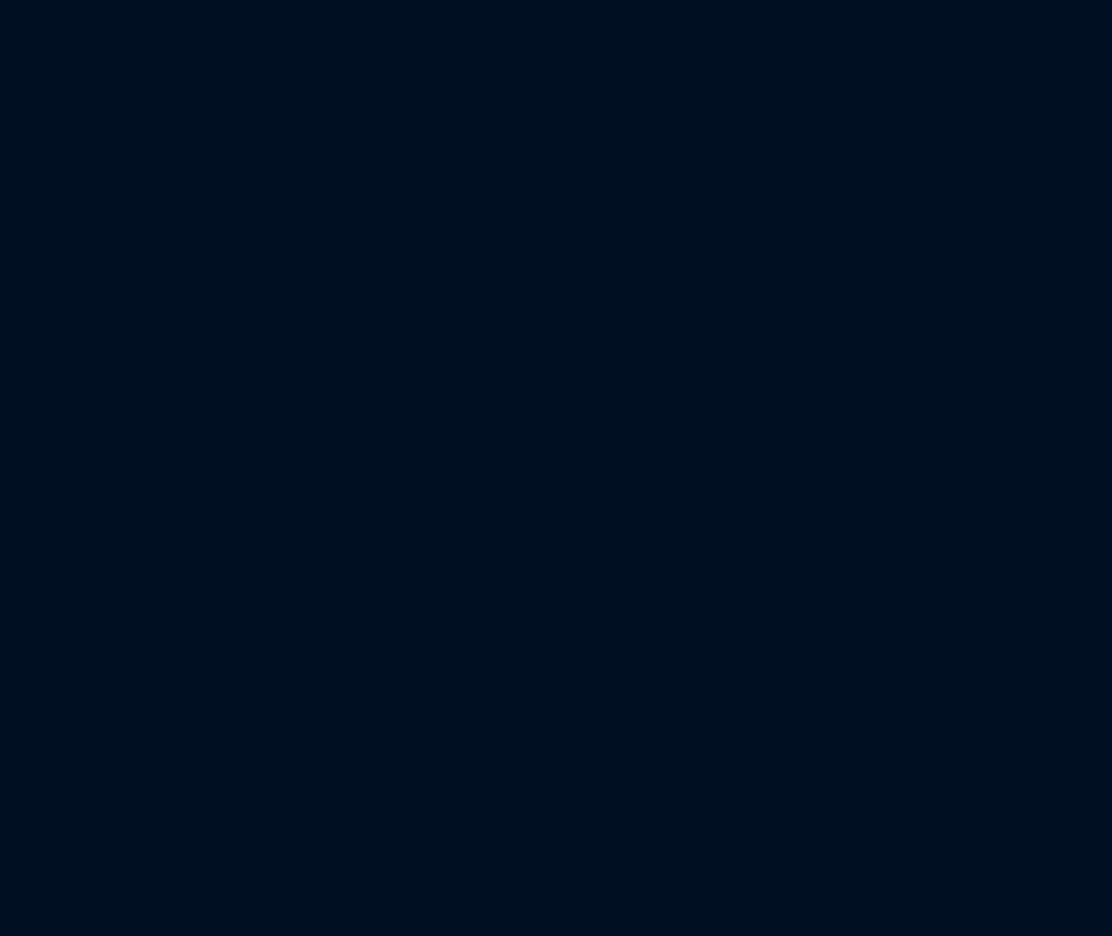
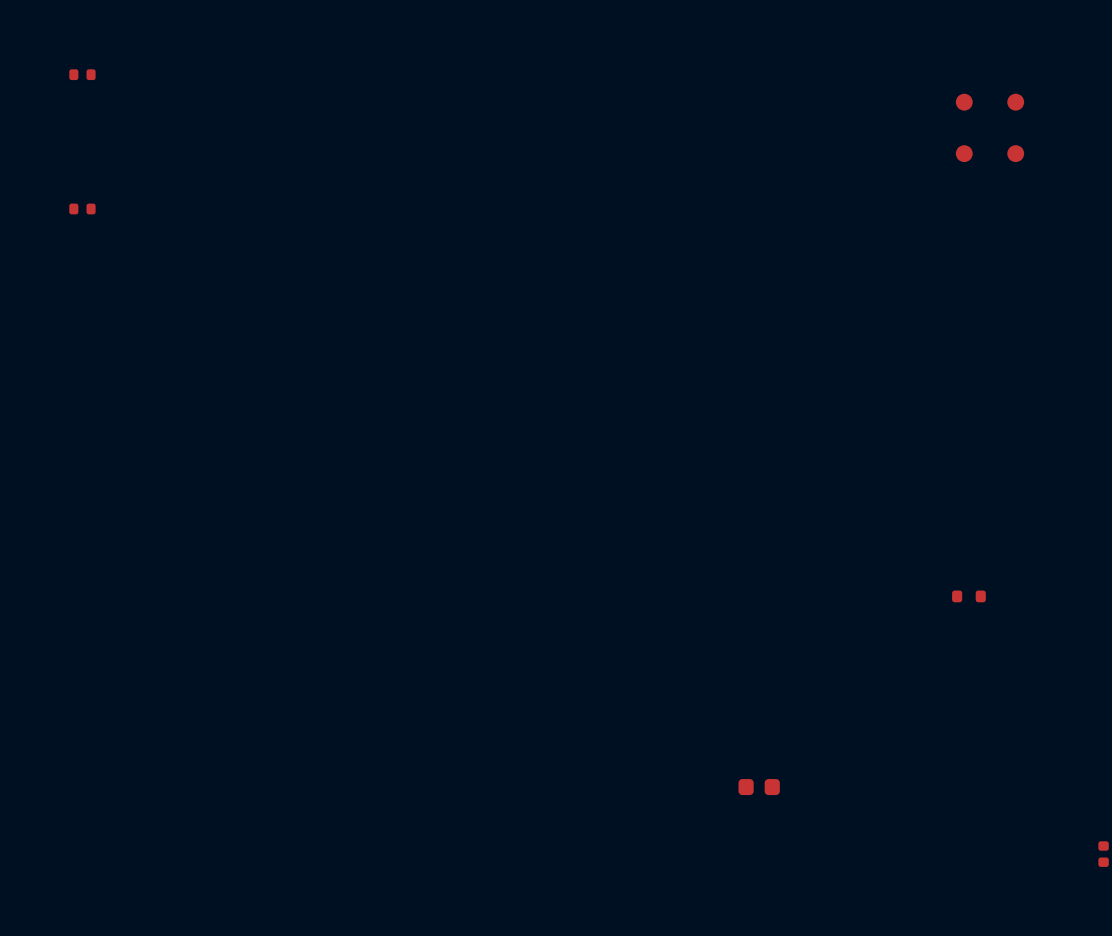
part: none -> (82, 74)
part: none -> (964, 102)
part: none -> (1015, 102)
part: none -> (964, 153)
part: none -> (1015, 153)
part: none -> (82, 208)
part: none -> (968, 596)
part: none -> (759, 787)
part: none -> (1103, 854)

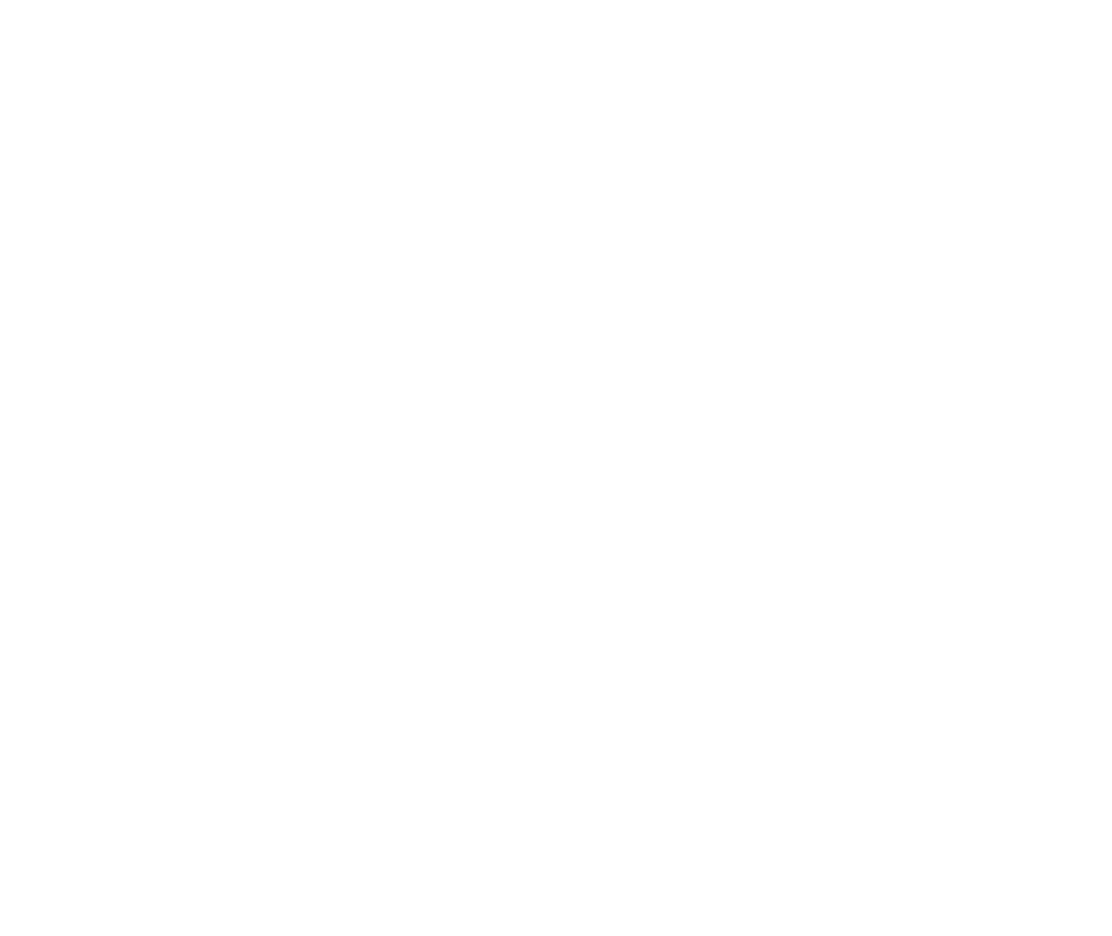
part: (82, 74) -> none
part: (964, 102) -> none
part: (1015, 102) -> none
part: (964, 153) -> none
part: (1015, 153) -> none
part: (82, 208) -> none
part: (968, 596) -> none
part: (759, 787) -> none
part: (1103, 854) -> none

